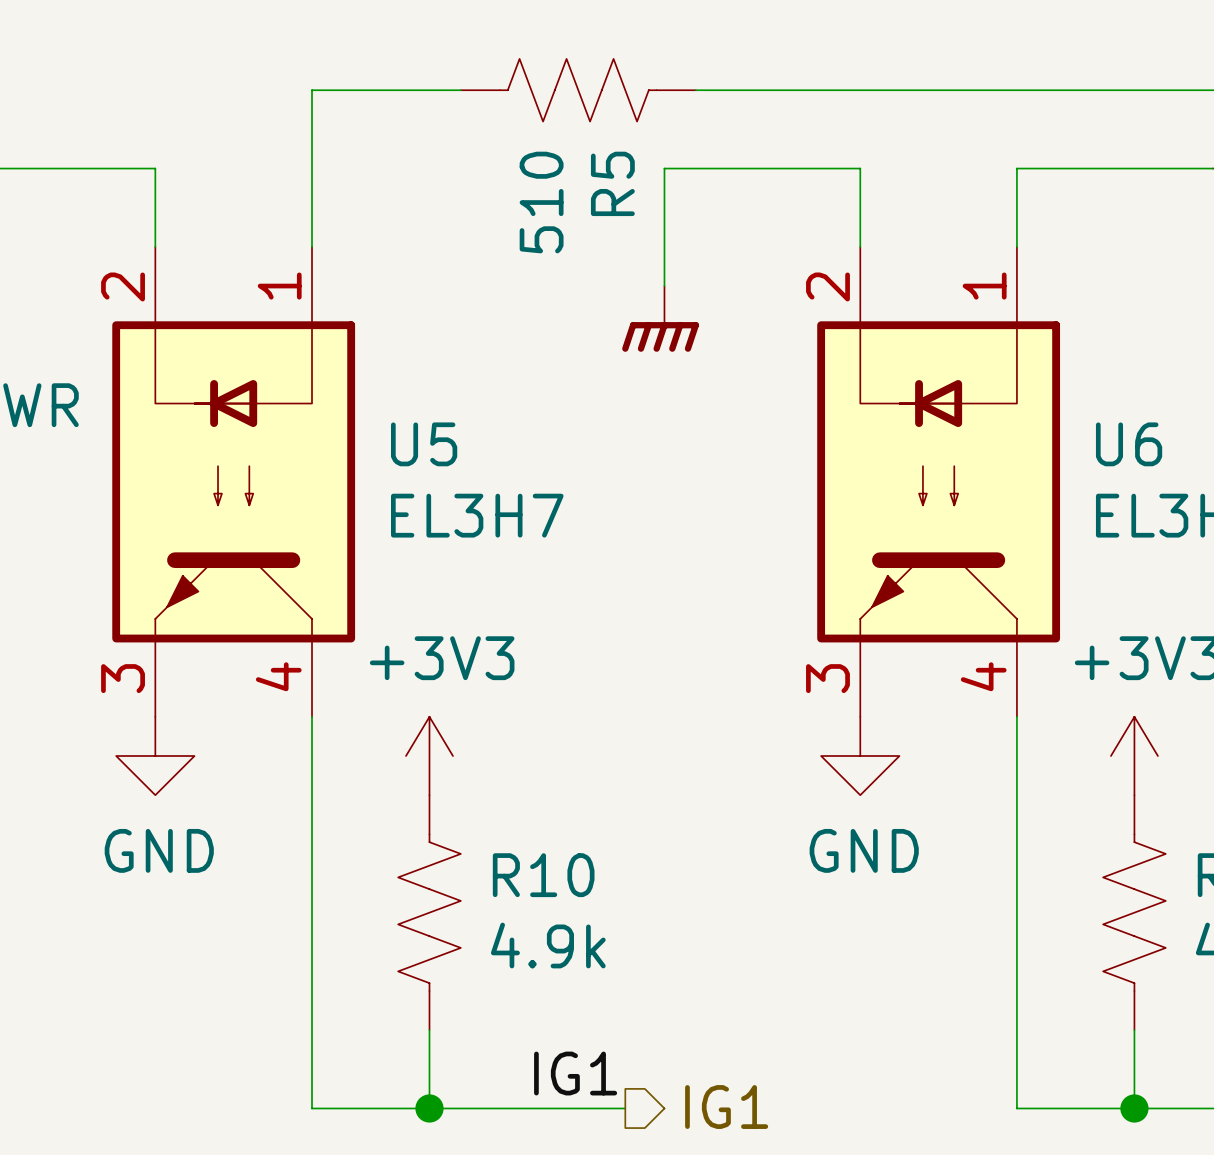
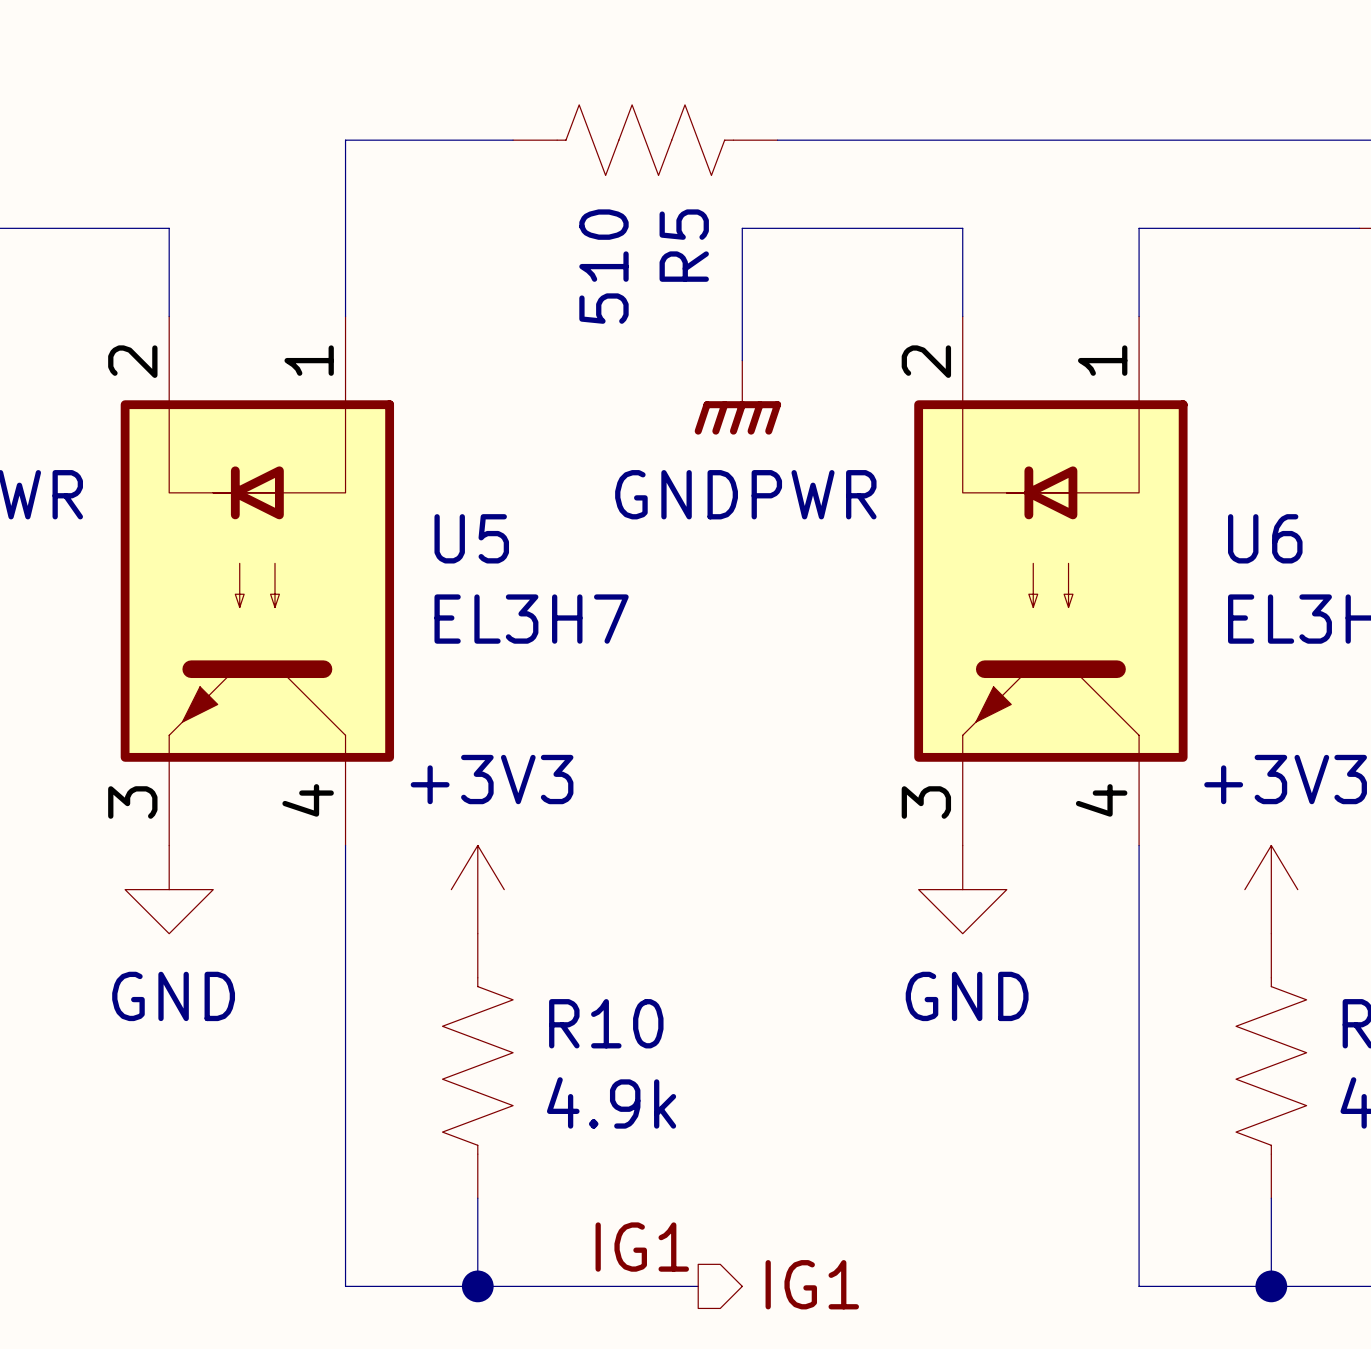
power symbol text: none -> GNDPWR (745, 494)

